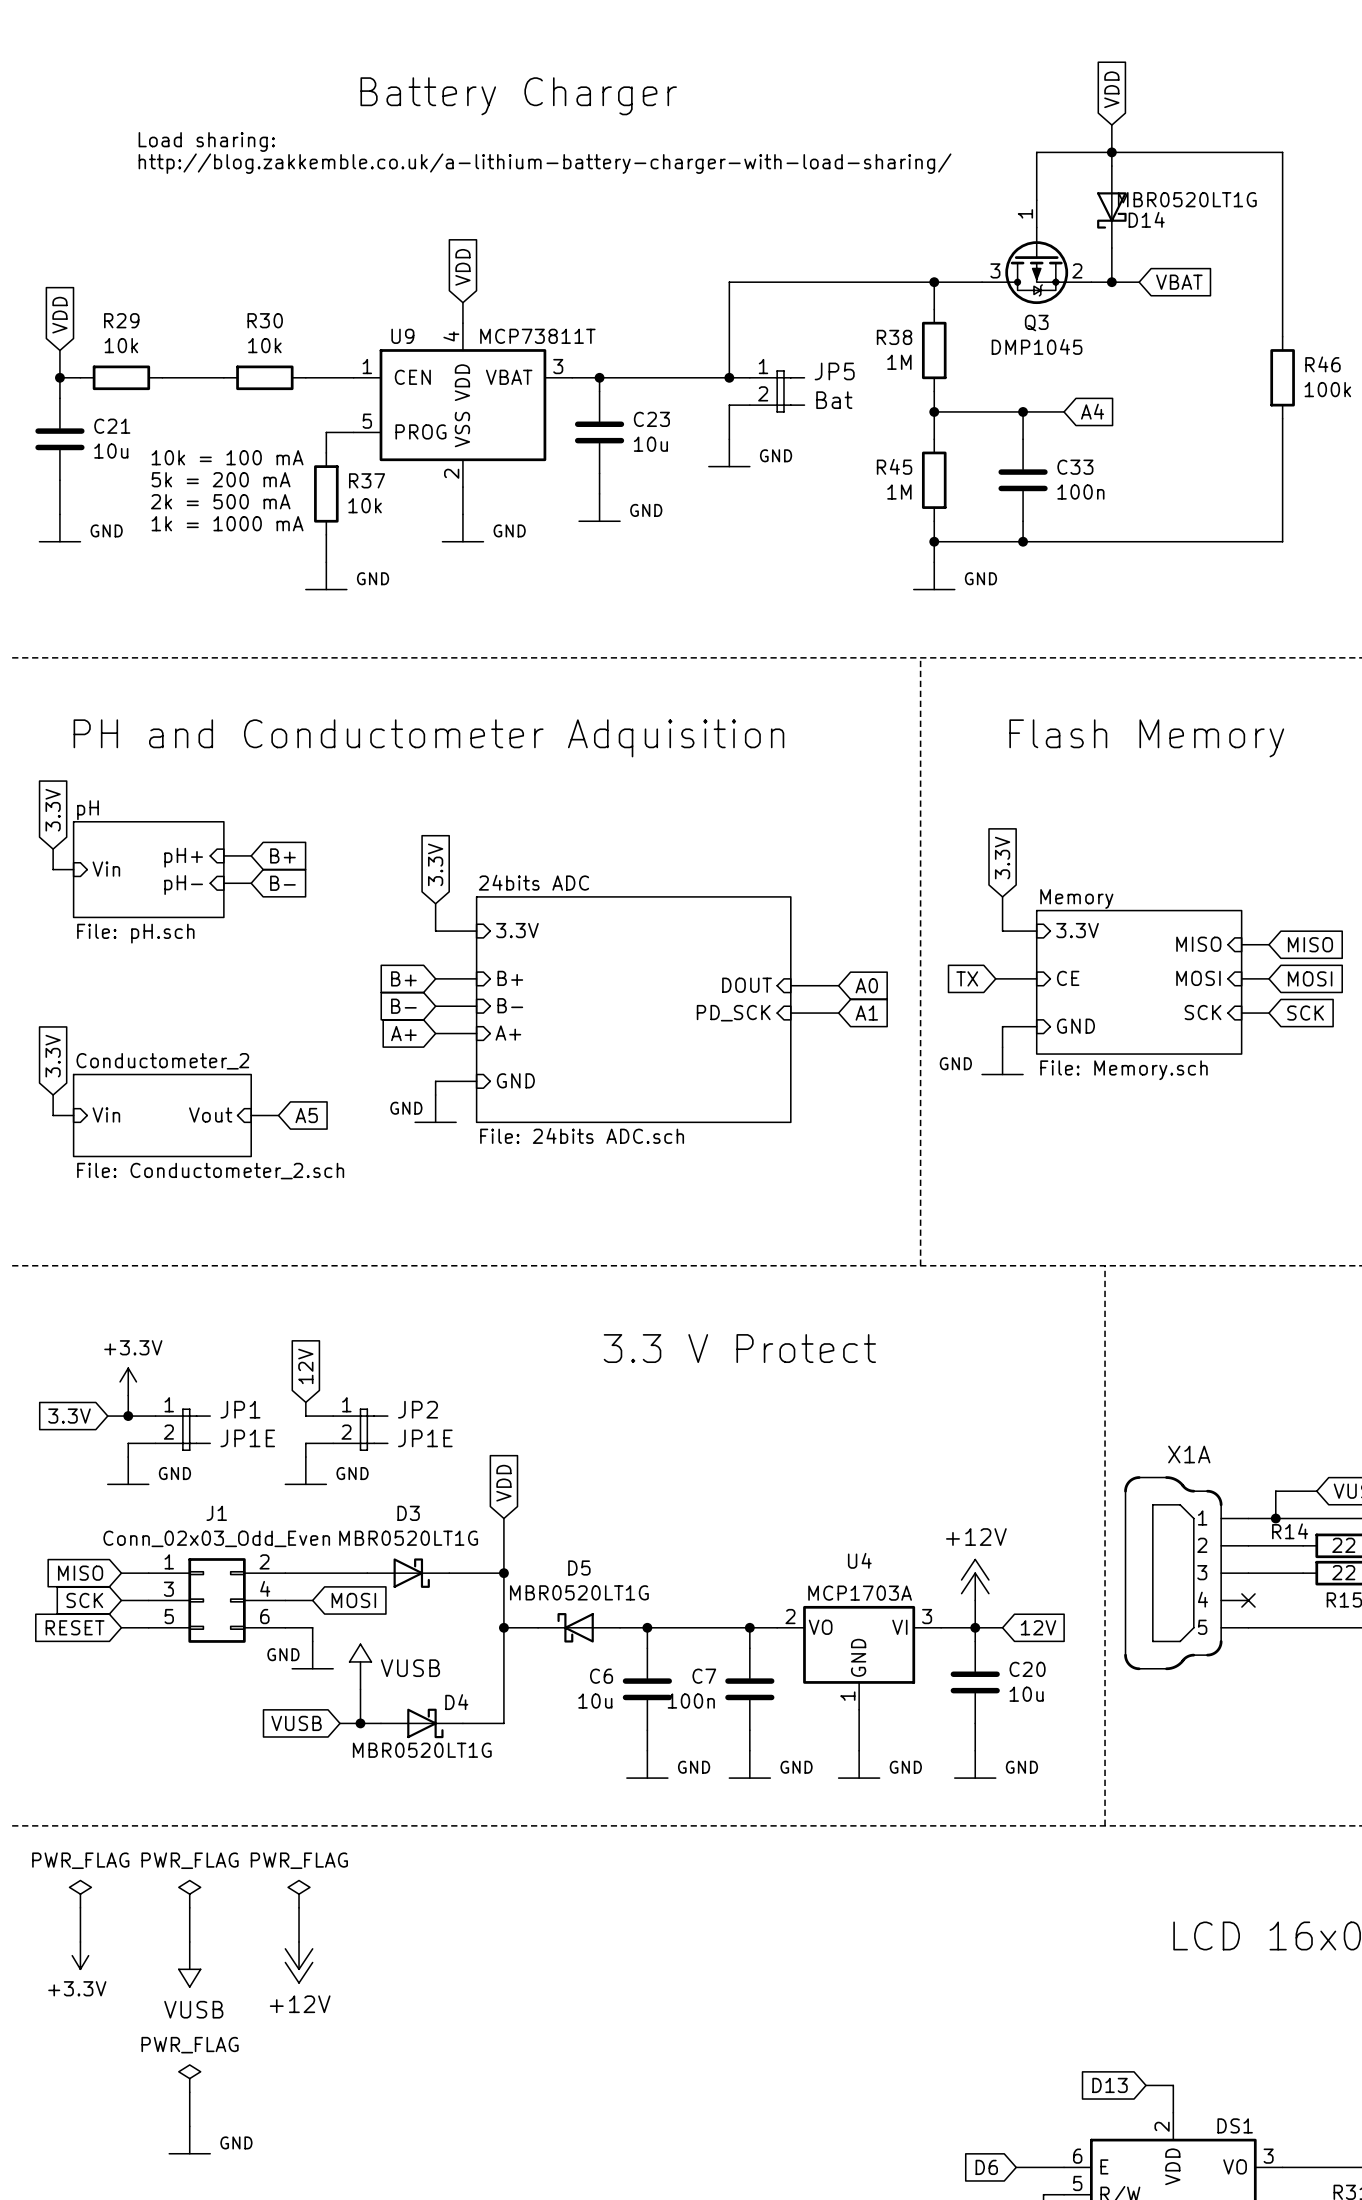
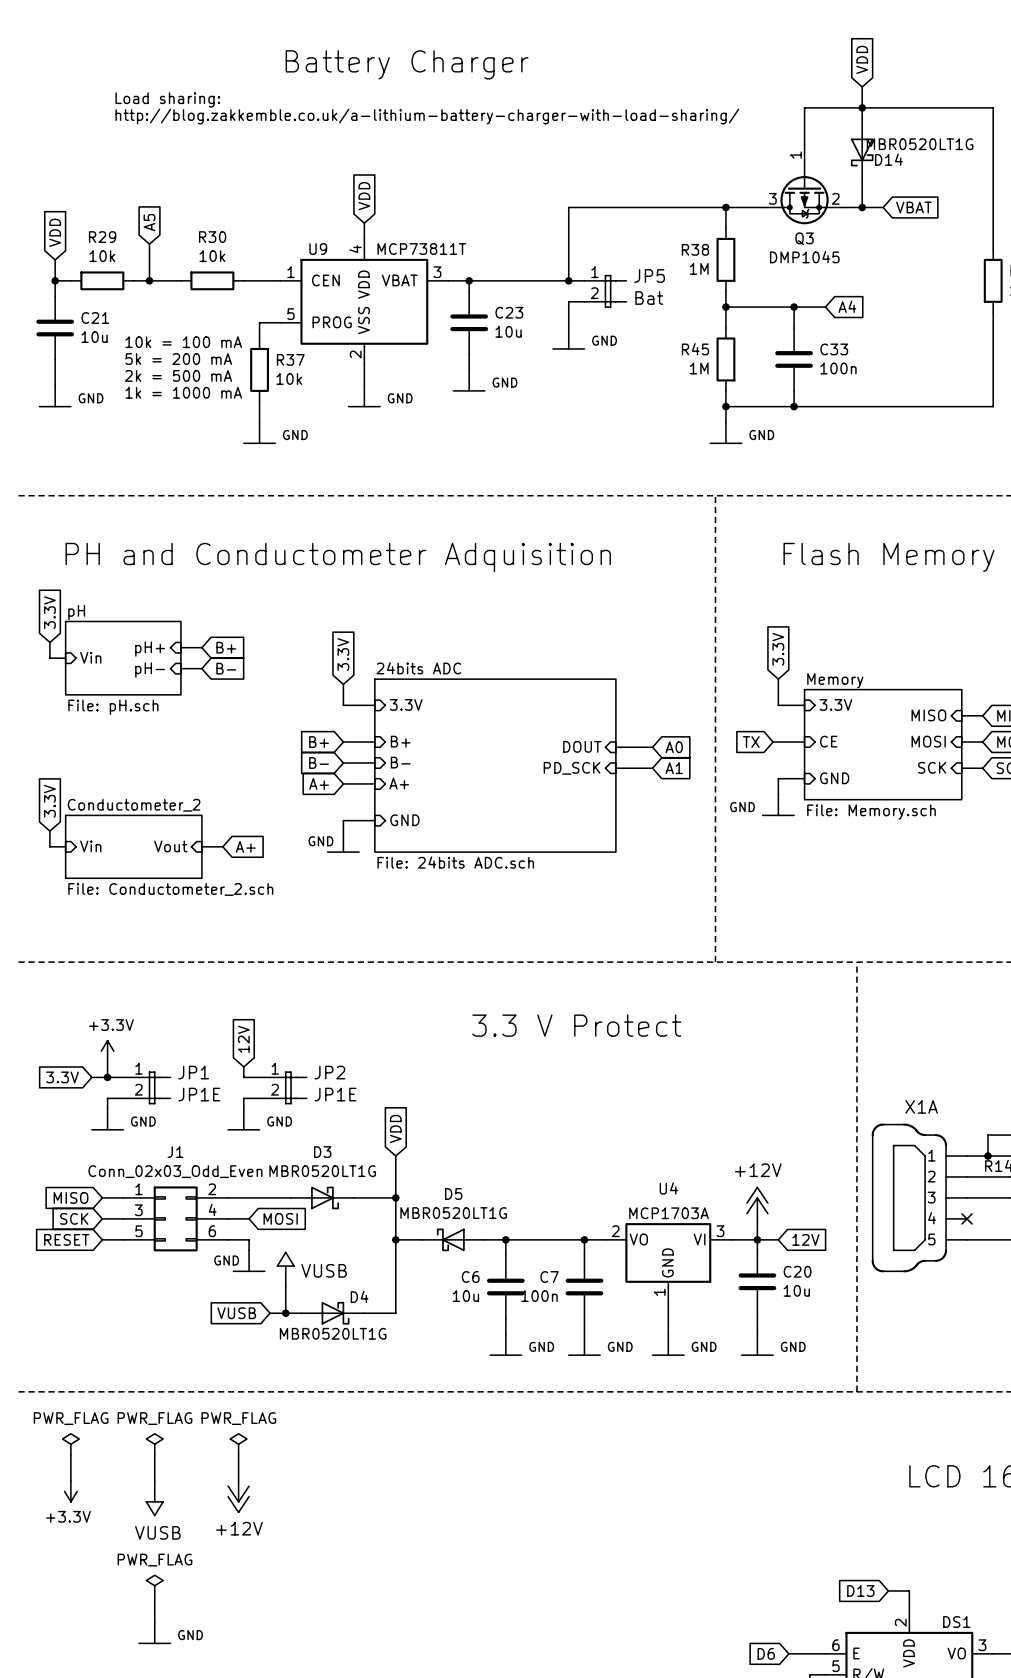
global label: none -> A5 (149, 222)
wire: none -> (149, 244) (149, 280)
junction: none -> (149, 280)
global label: A5 (306, 1115) -> A+ (245, 846)

